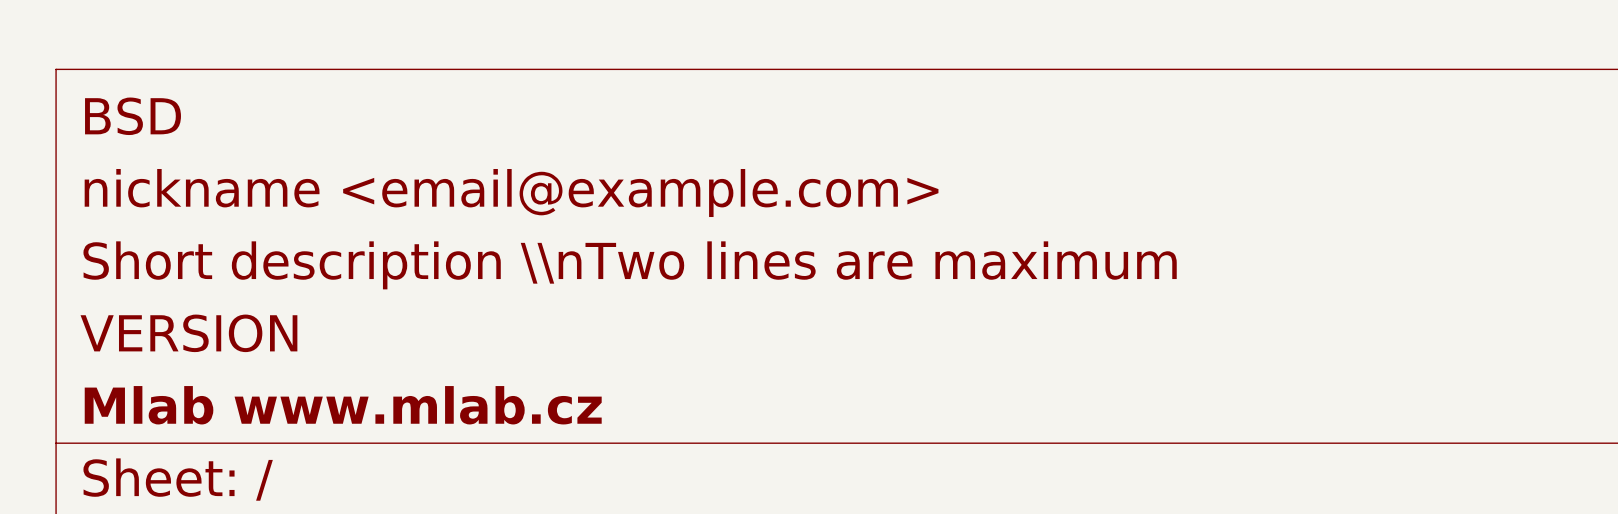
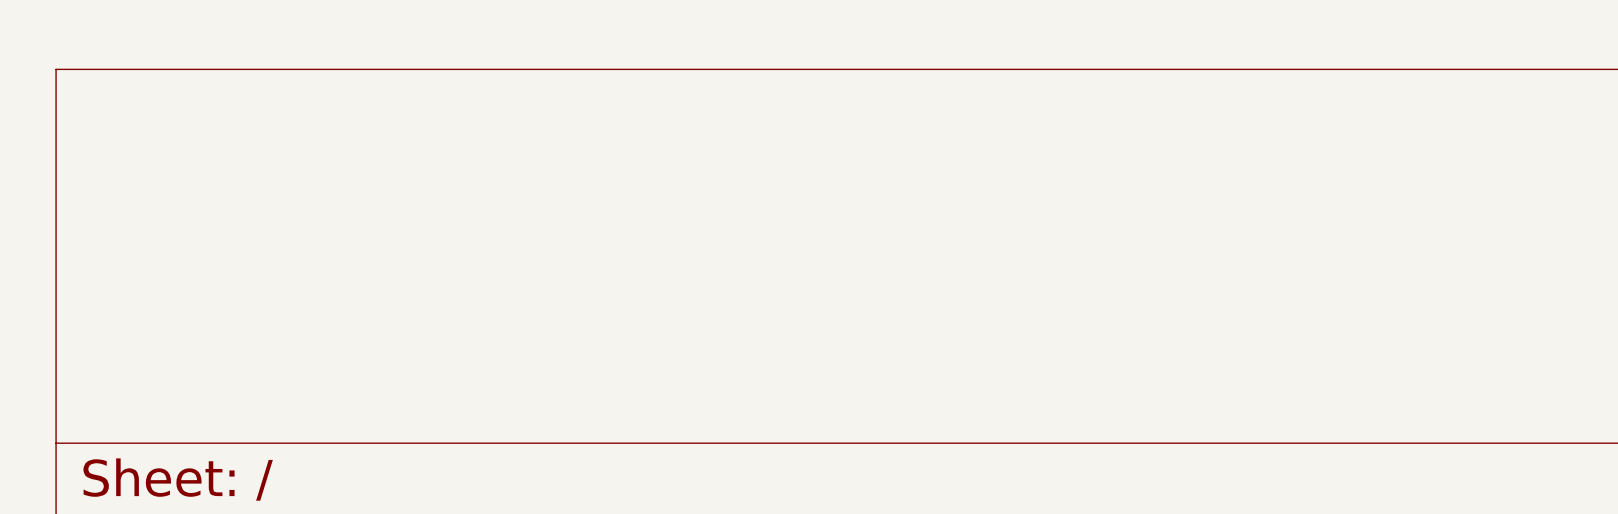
title block: BSD (133, 116) -> none
title block: nickname <email@example.com> (511, 193) -> none
title block: Short description \\nTwo lines are maximum (630, 265) -> none
title block: VERSION (188, 333) -> none
title block: Mlab www.mlab.cz (343, 405) -> none

